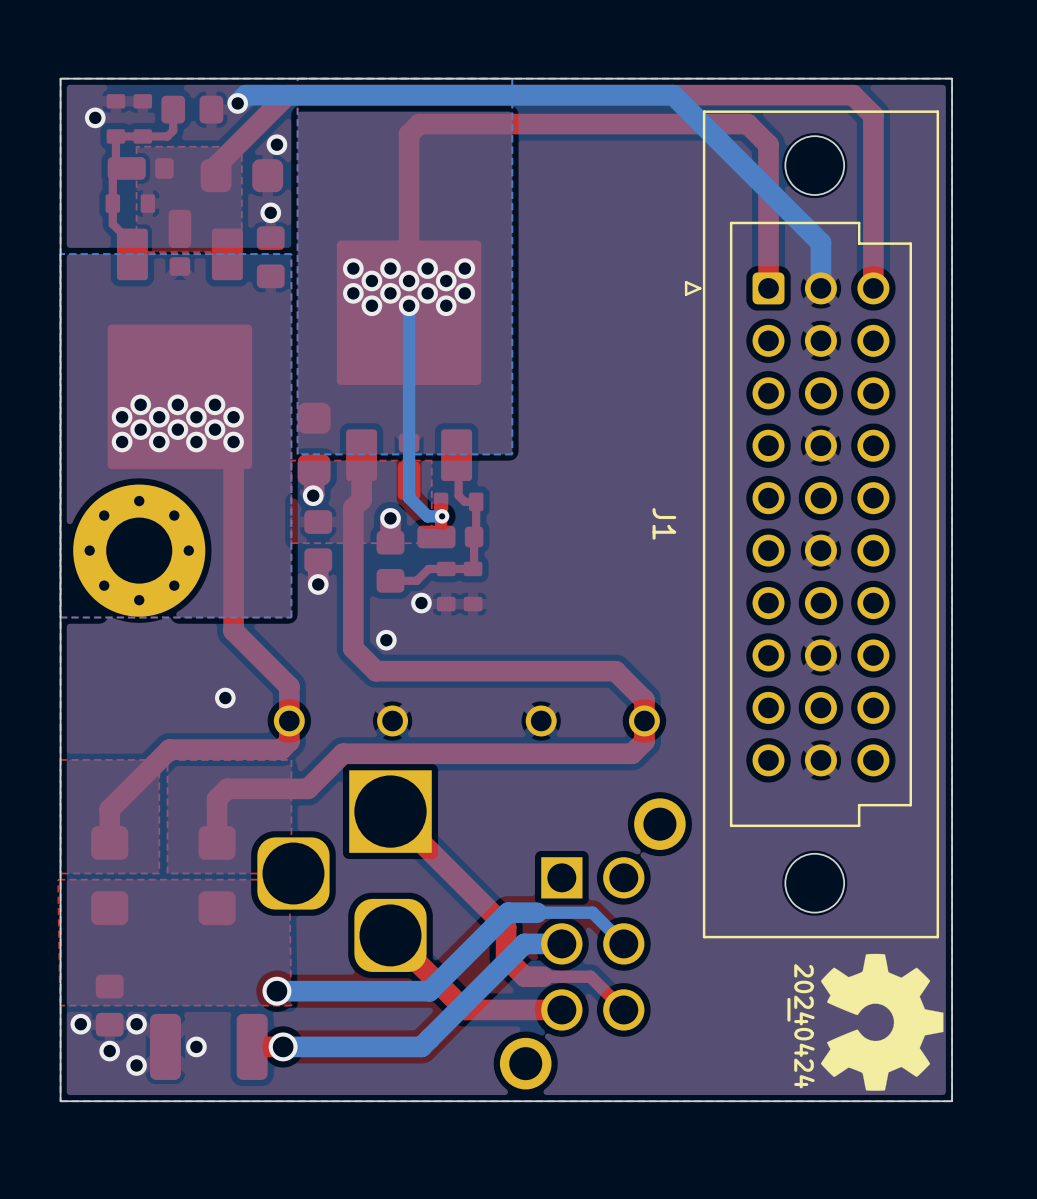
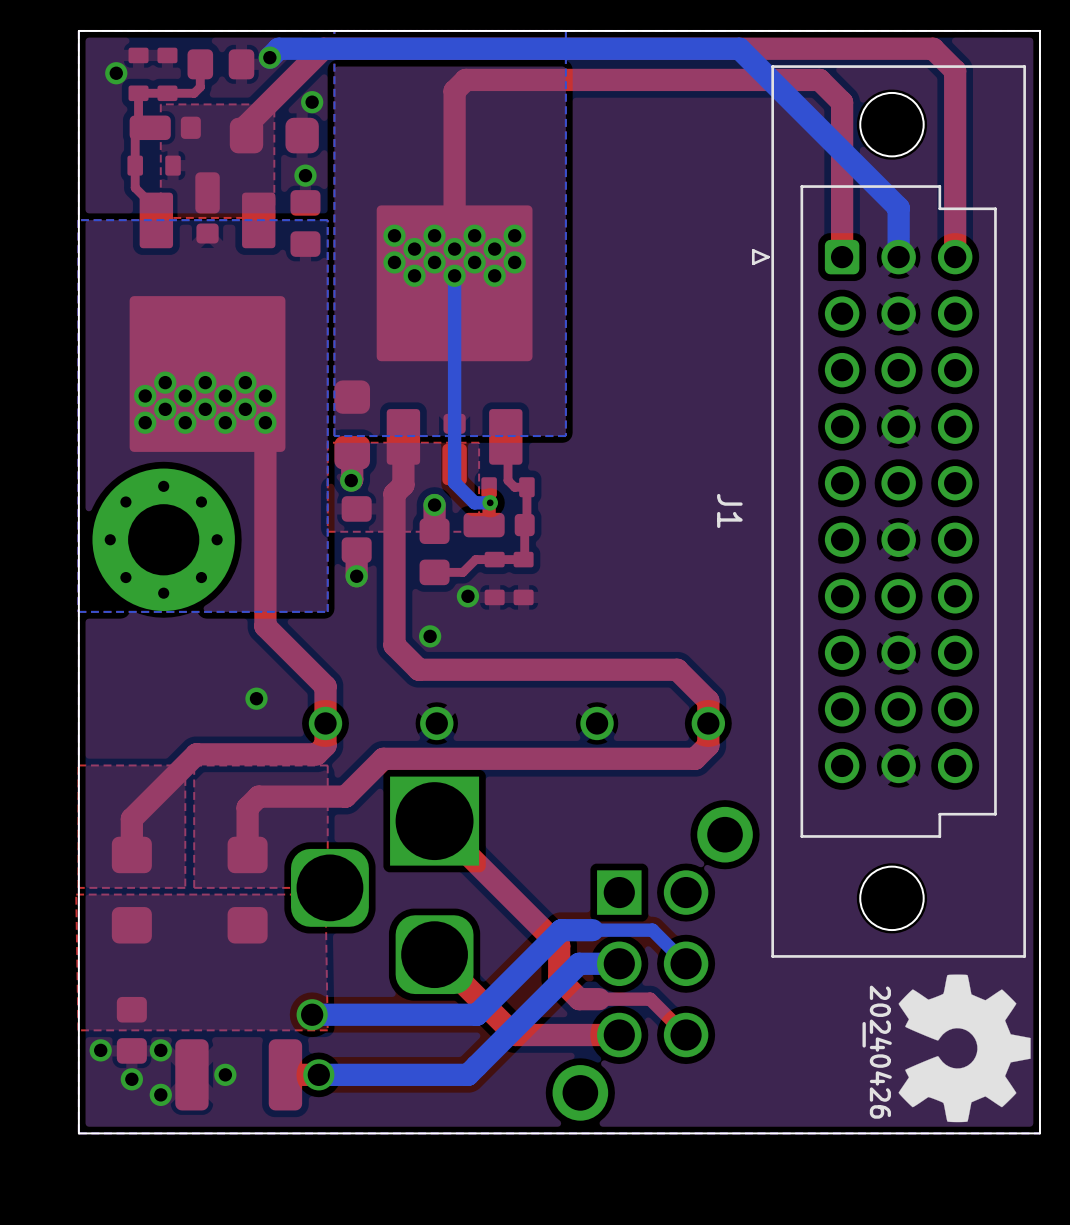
drawing shape: [787, 964, 815, 1089] -> [862, 985, 892, 1119]

